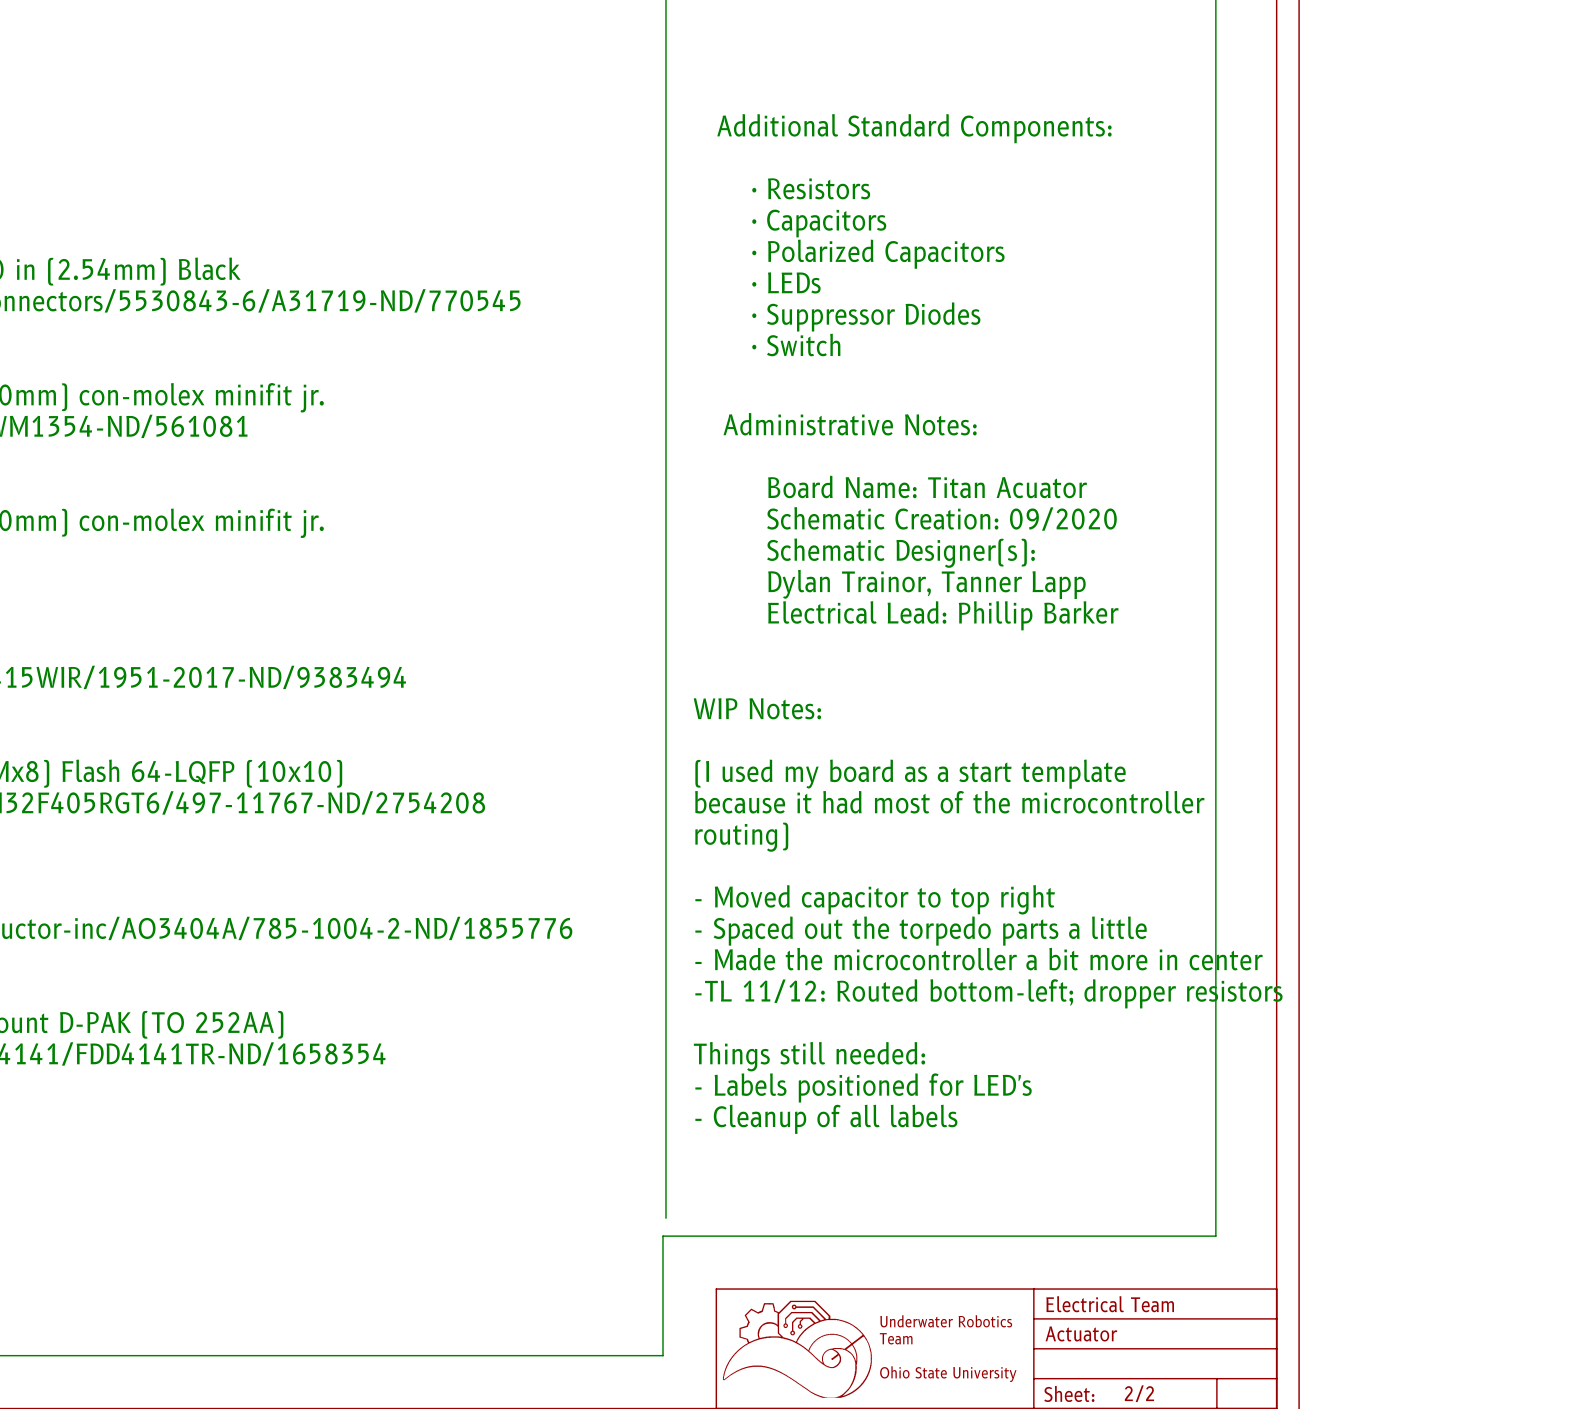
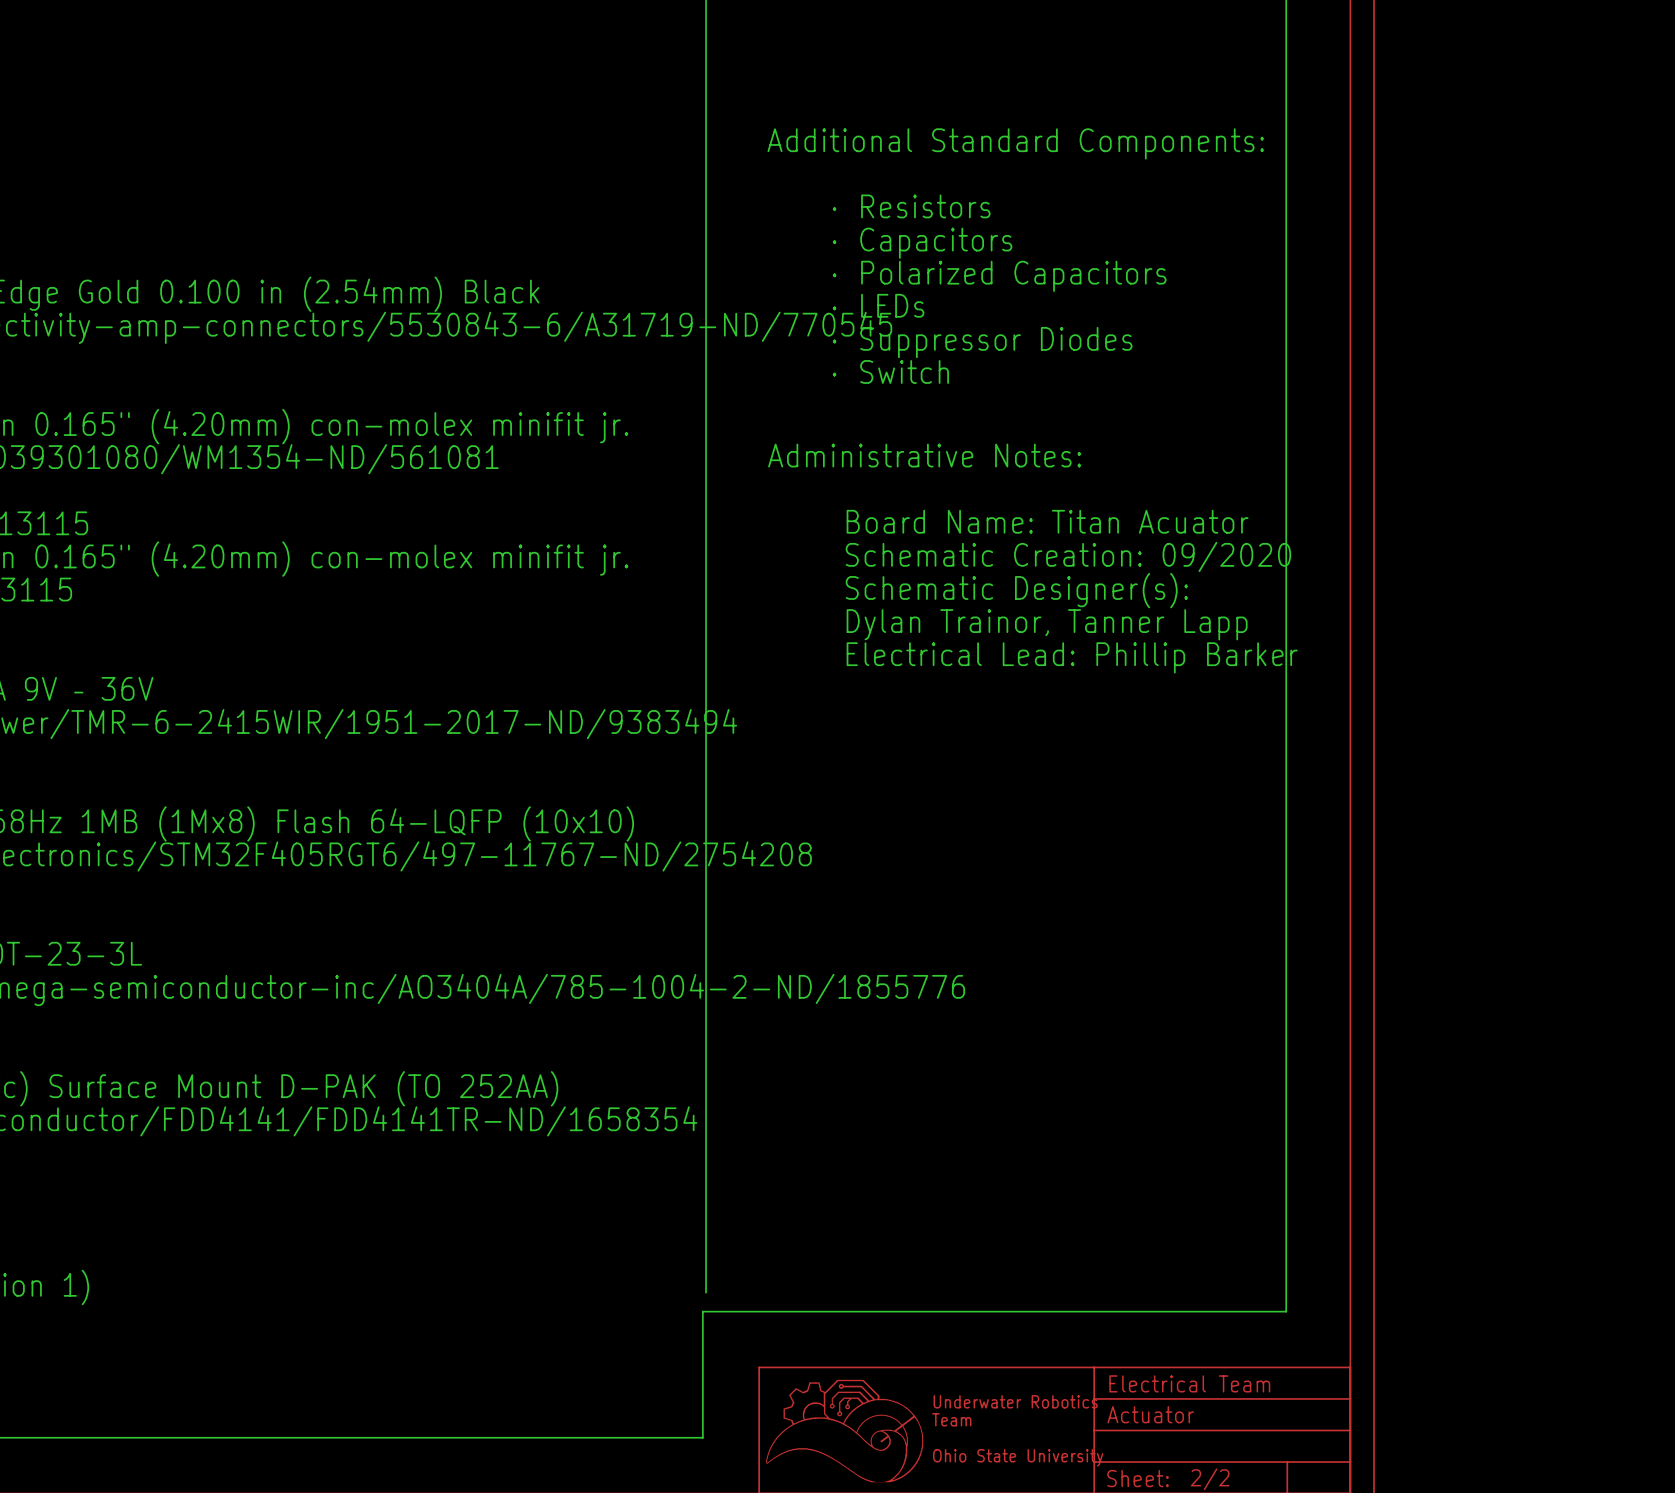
text: WIP Notes: (757, 708) -> none
text: (I used my board as a start template (910, 774) -> none
text: because it had most of the microcontroller (949, 802) -> none
text: routing) (741, 837) -> none
text: - Moved capacitor to top right (875, 899) -> none
text: - Spaced out the torpedo parts a little (921, 931) -> none
text: - Made the microcontroller a bit more in center (979, 959) -> none
text: -TL 11/12: Routed bottom-left; dropper resistors (988, 993) -> none
text: Things still needed: (809, 1056) -> none
text: - Labels positioned for LED's (863, 1087) -> none
text: - Cleanup of all labels (826, 1119) -> none

